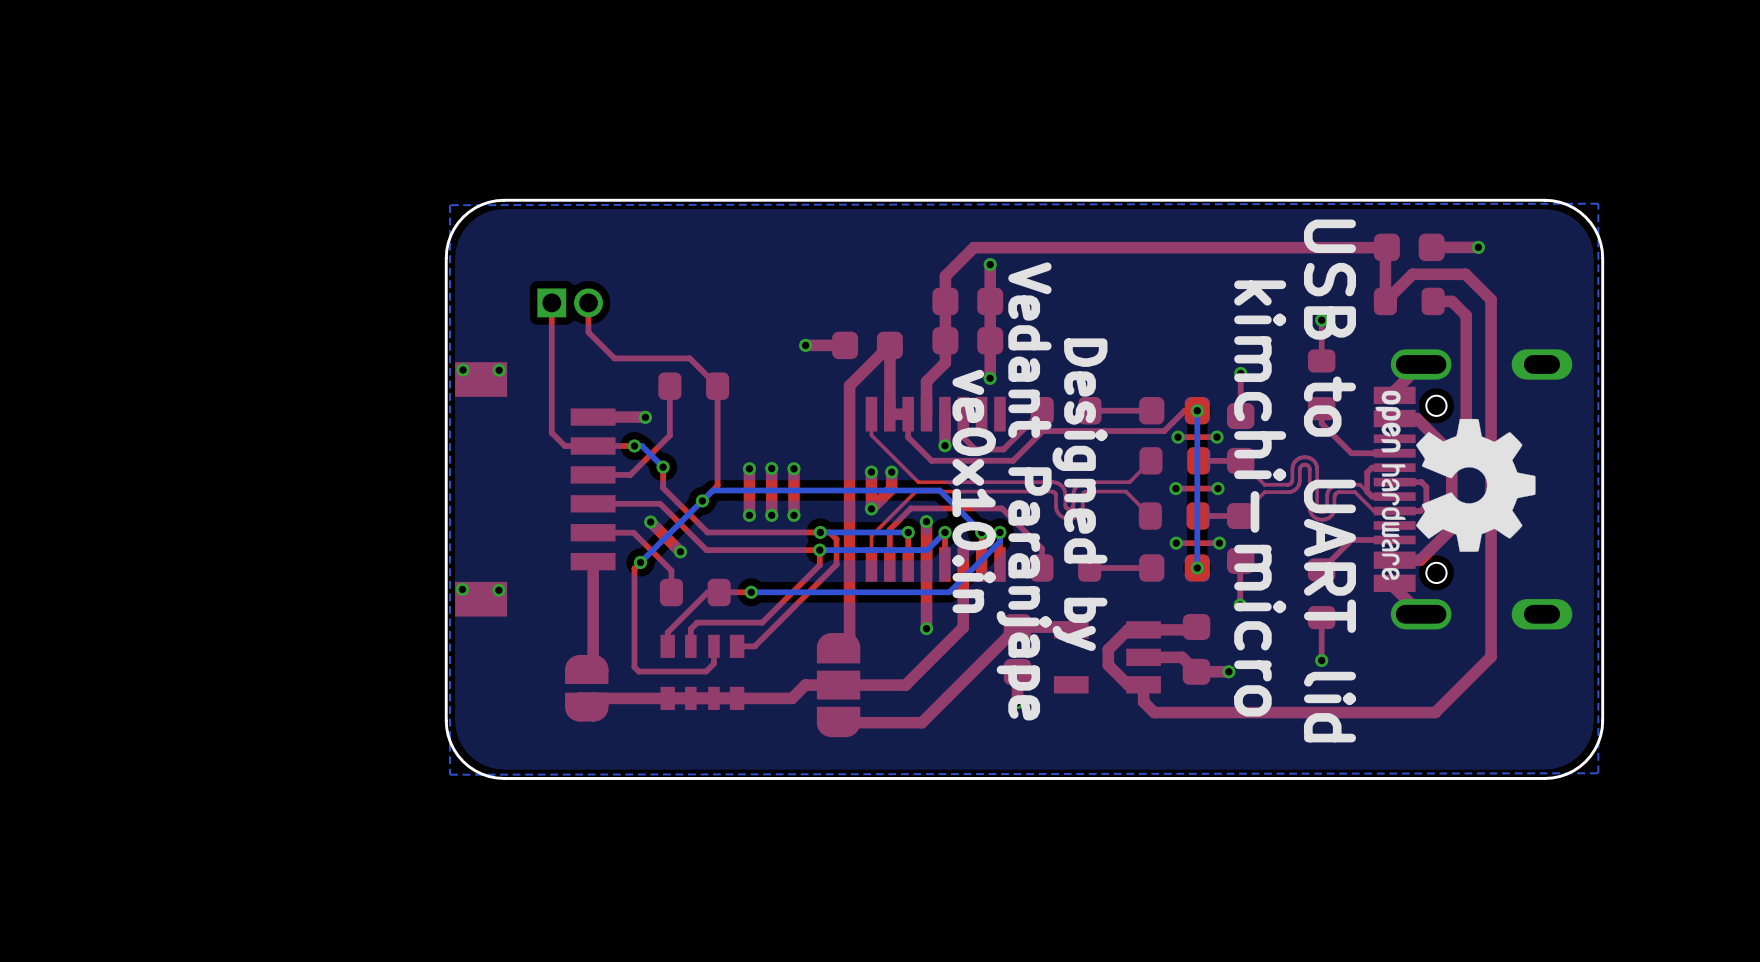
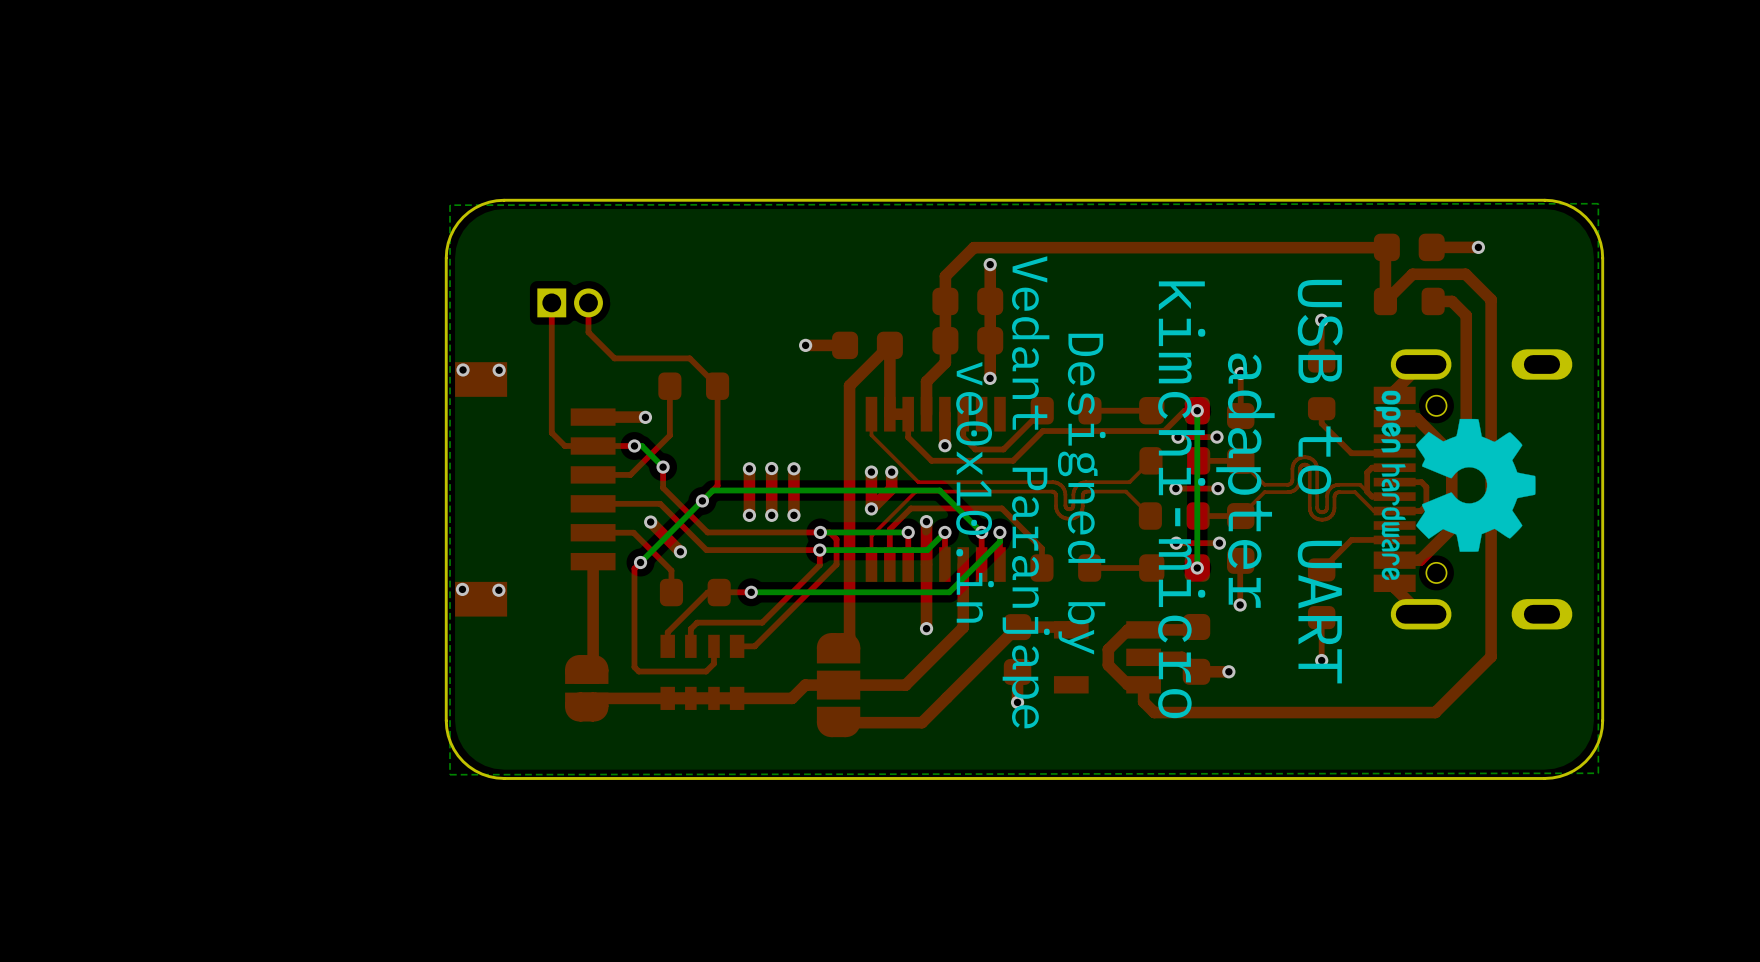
text: USB to UART lid (1329, 480) -> USB to UART (1320, 481)
text: none -> kimchi-micro (1181, 499)
text: kimchi-micro (1260, 498) -> adapter (1245, 480)

